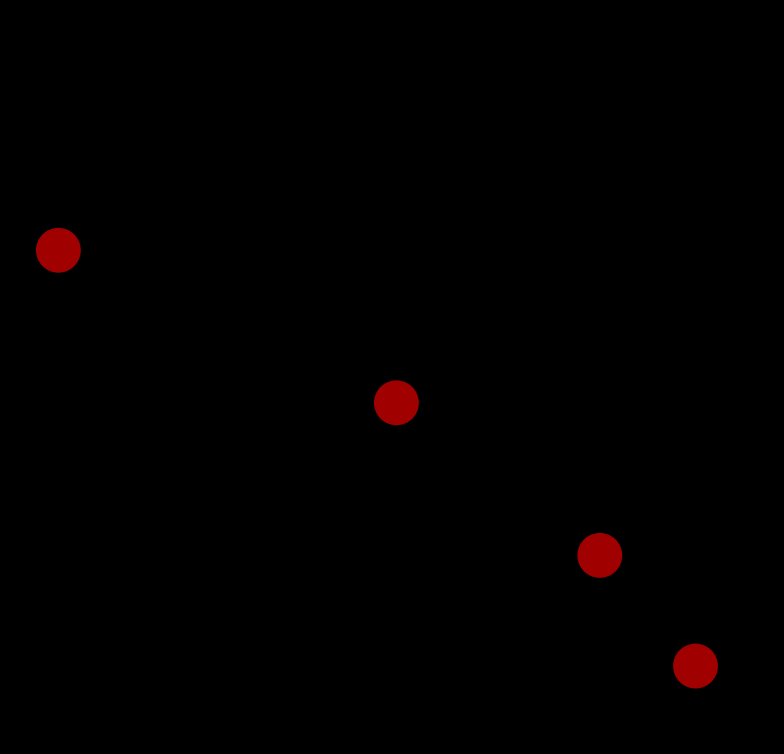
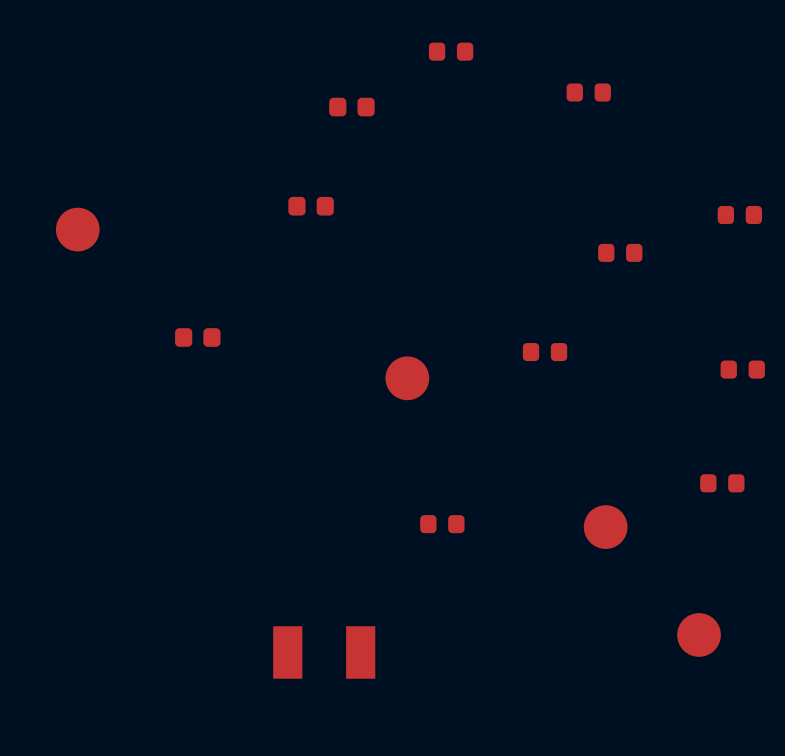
part: none -> (451, 51)
part: none -> (588, 92)
part: none -> (351, 107)
part: none -> (311, 206)
part: none -> (739, 214)
part: none -> (620, 252)
part: none -> (197, 337)
part: none -> (545, 352)
part: none -> (742, 369)
part: none -> (722, 483)
part: none -> (442, 524)
part: none -> (324, 652)

